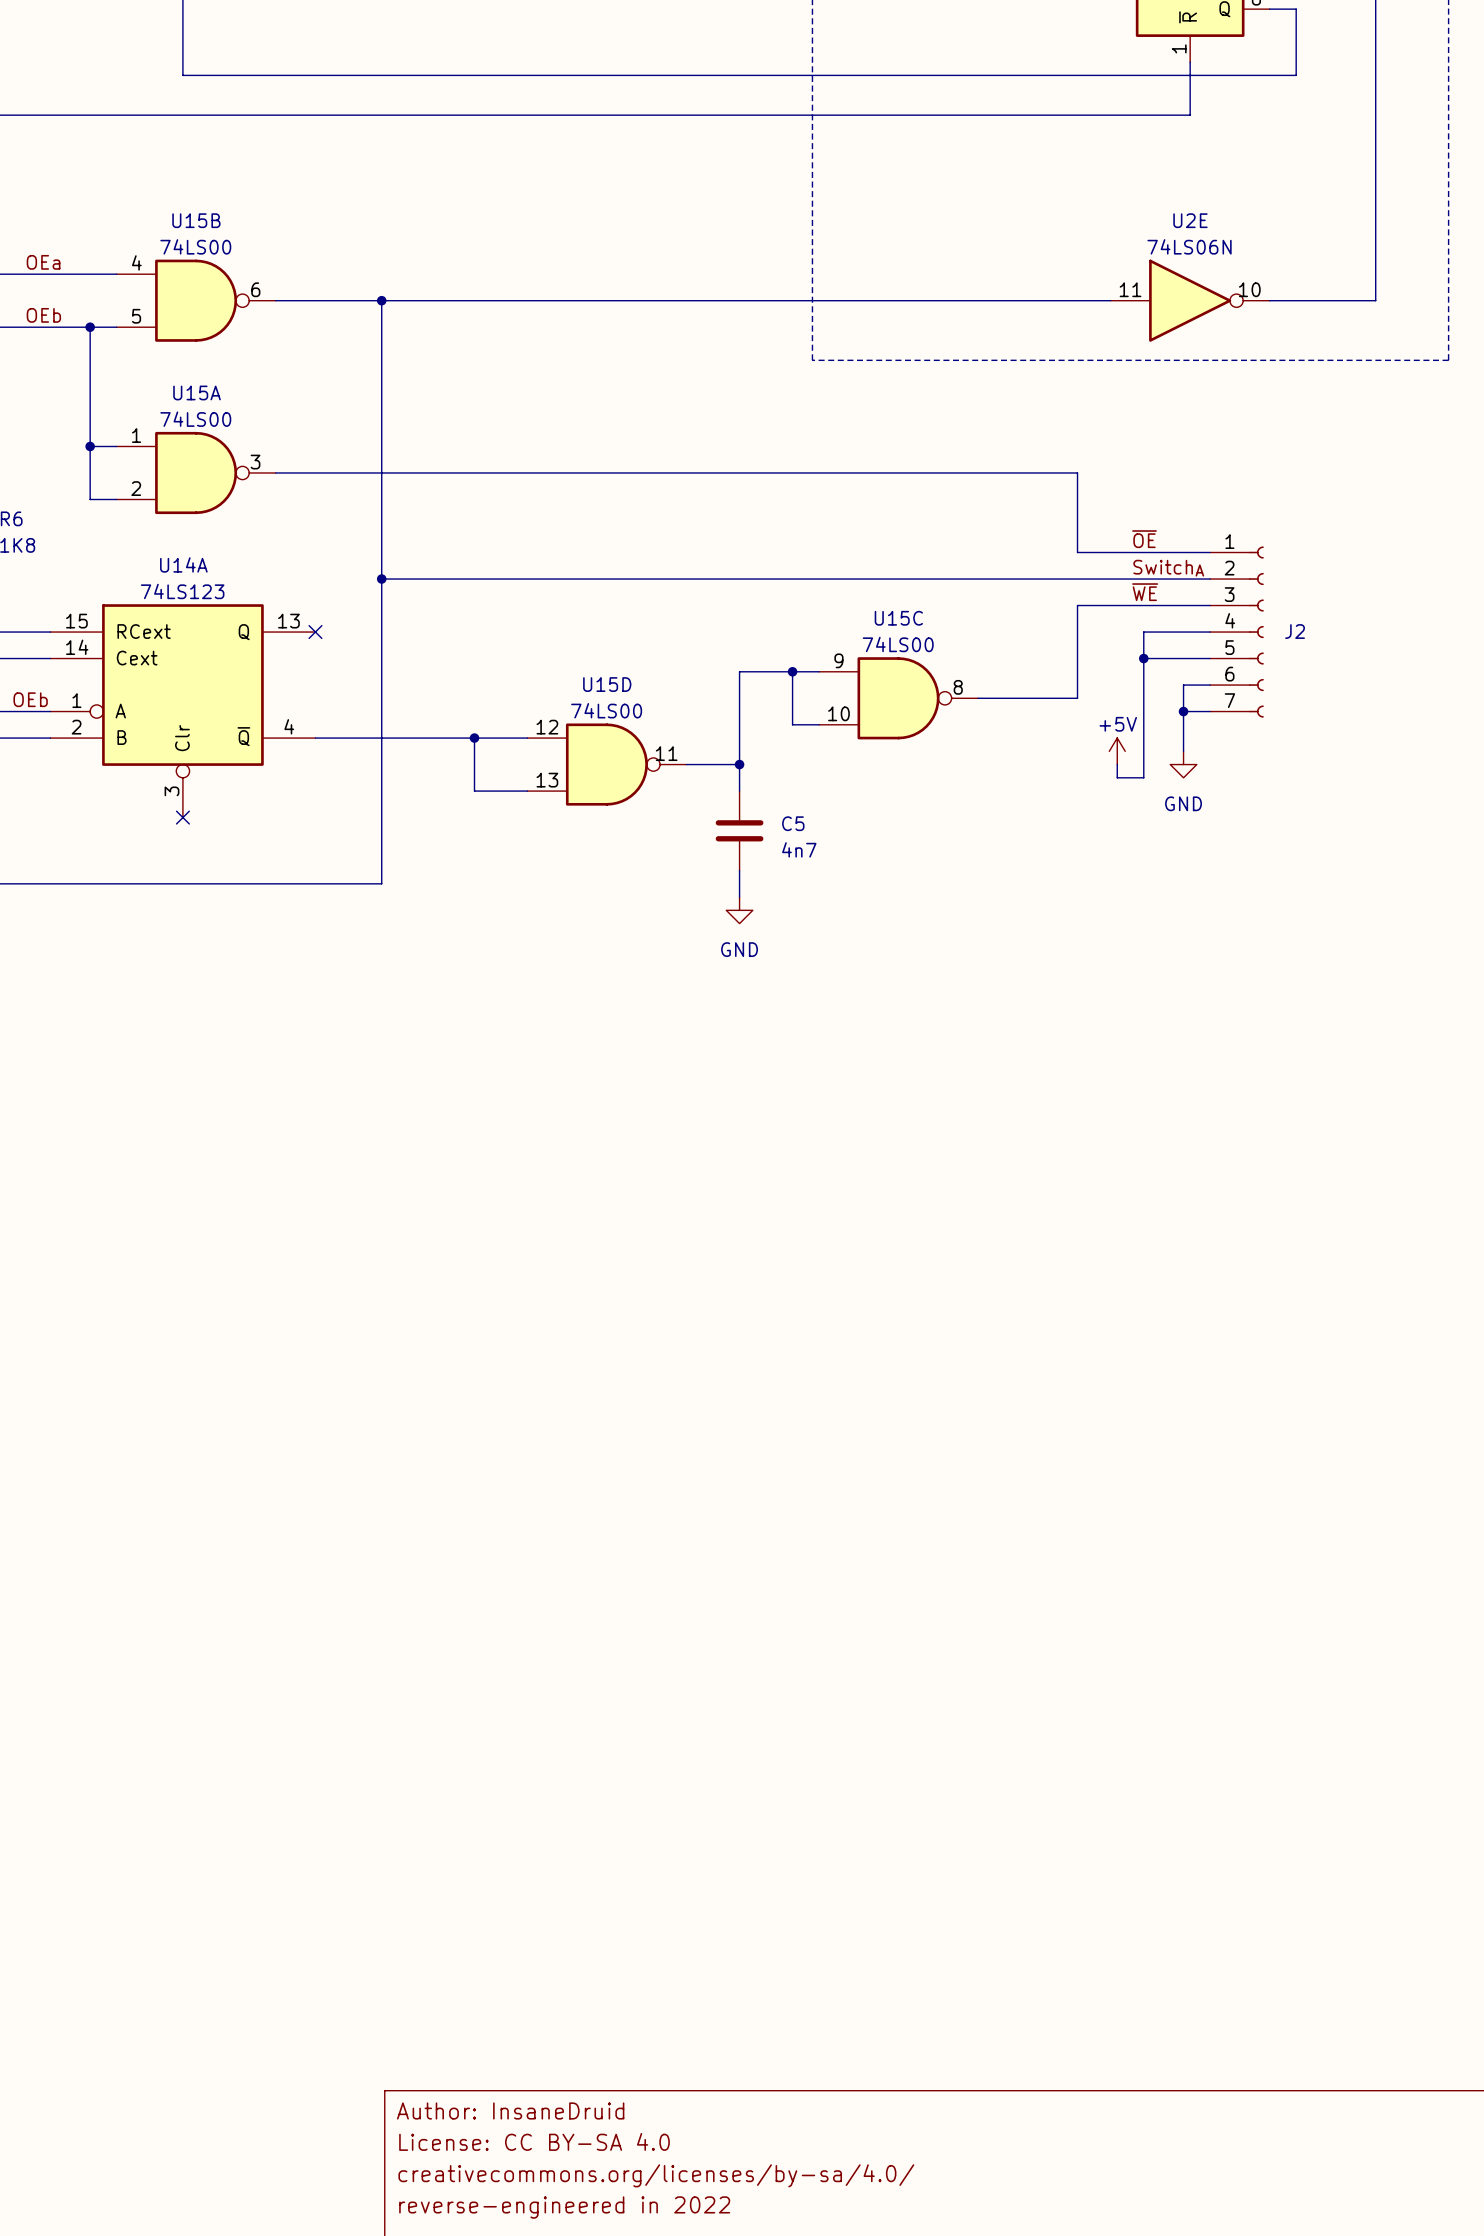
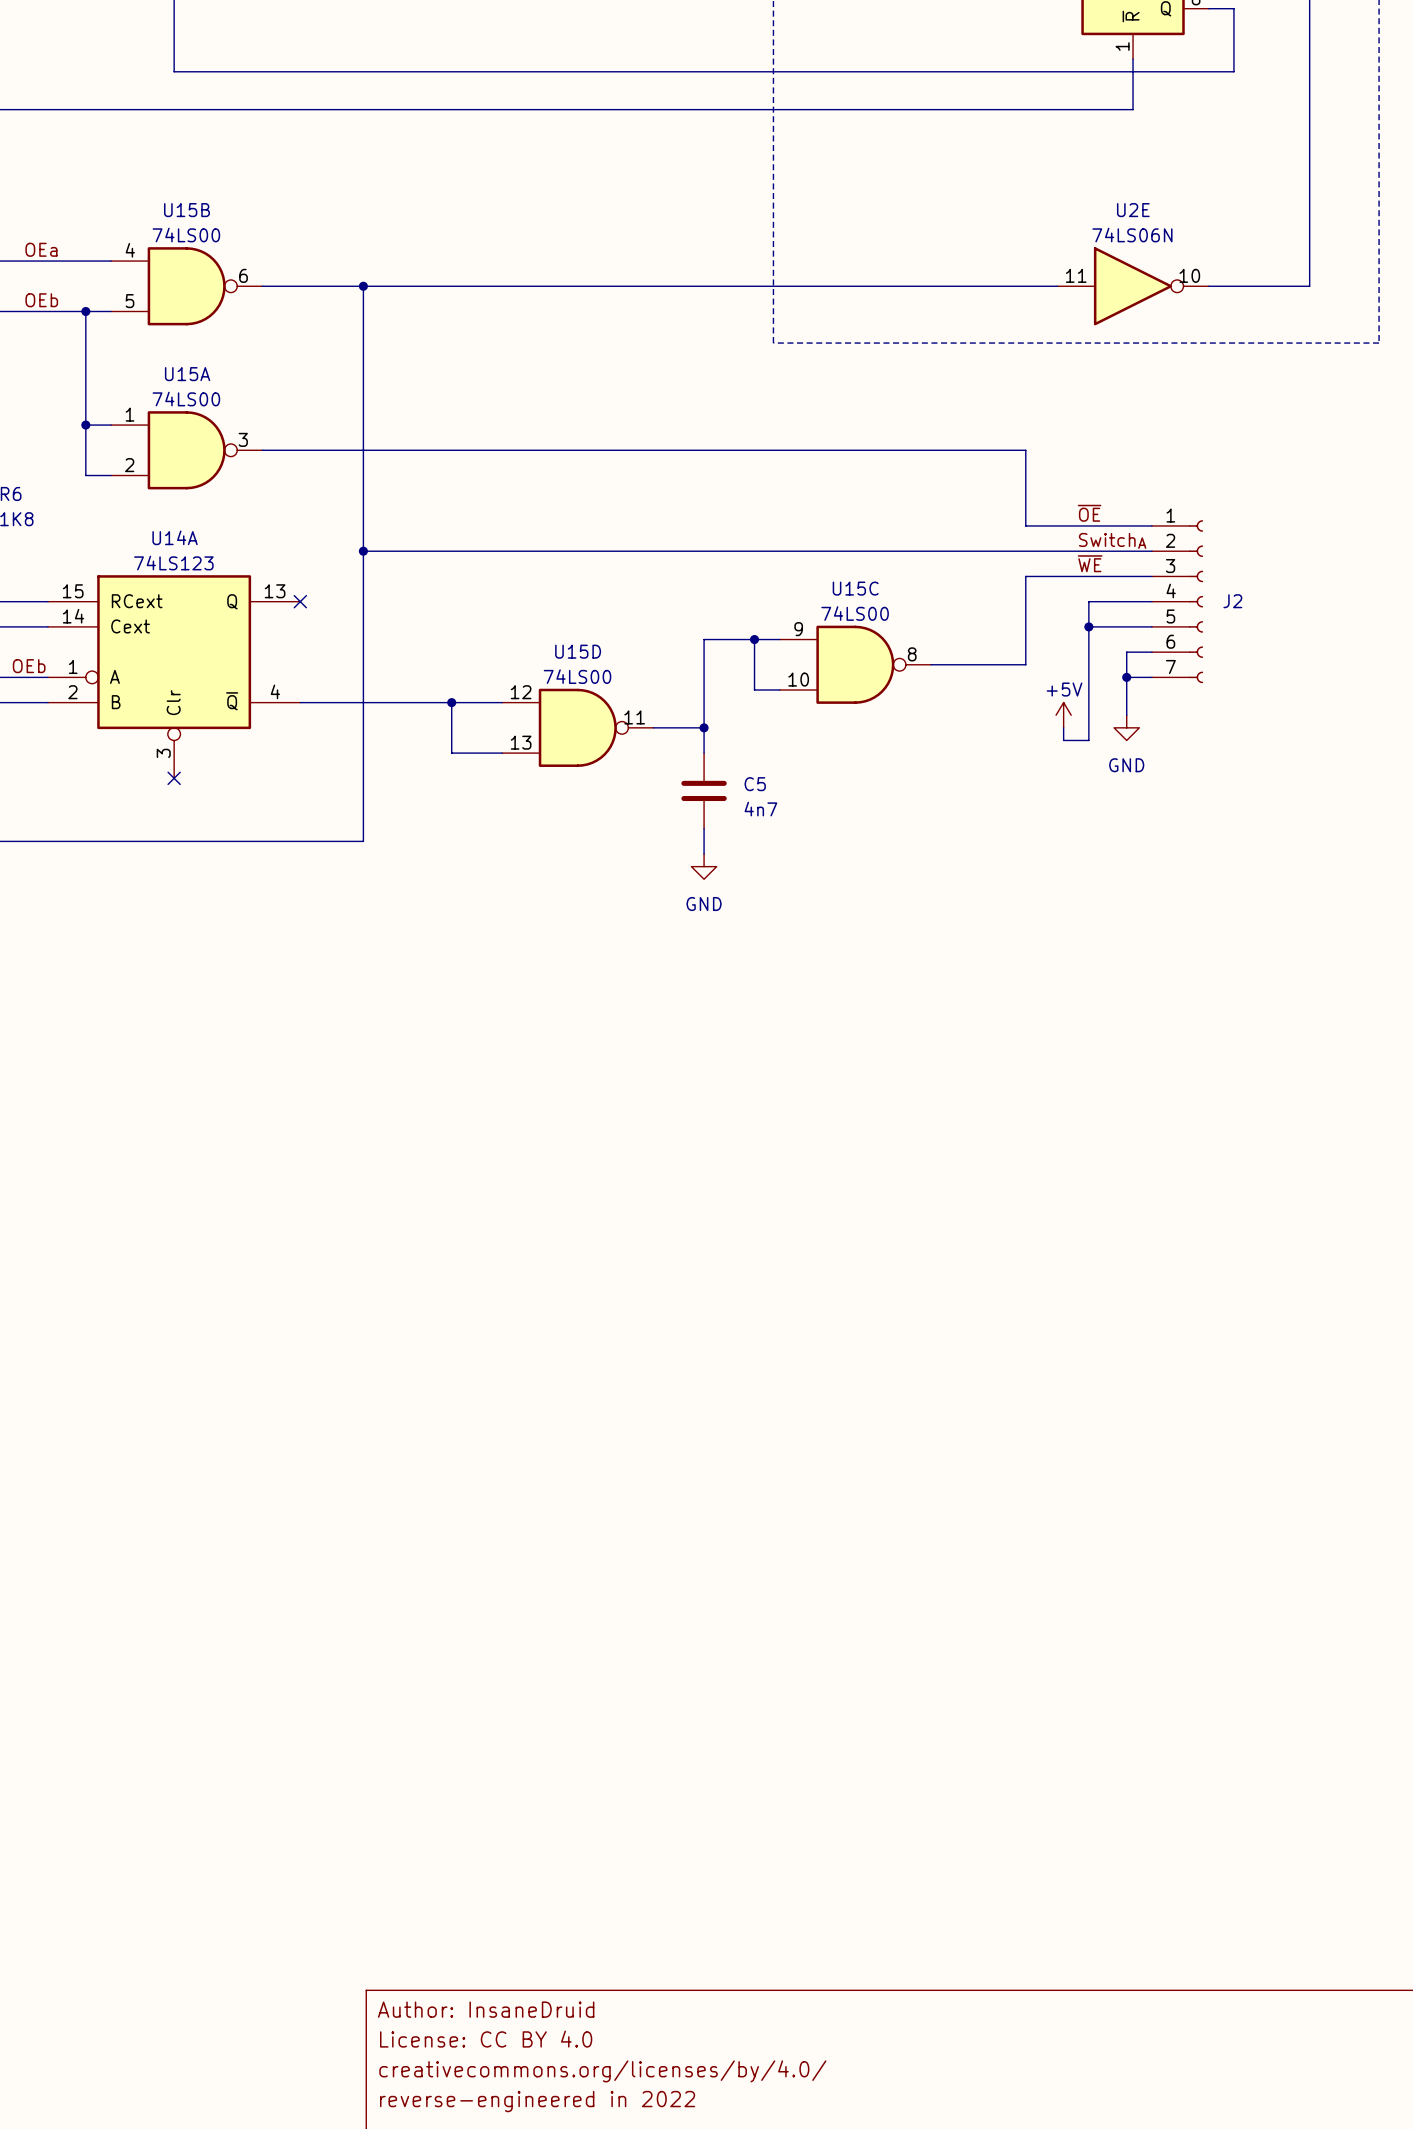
title block: License: CC BY-SA 4.0 (534, 2141) -> License: CC BY 4.0 (486, 2039)
title block: creativecommons.org/licenses/by-sa/4.0/ (656, 2175) -> creativecommons.org/licenses/by/4.0/ (602, 2071)

